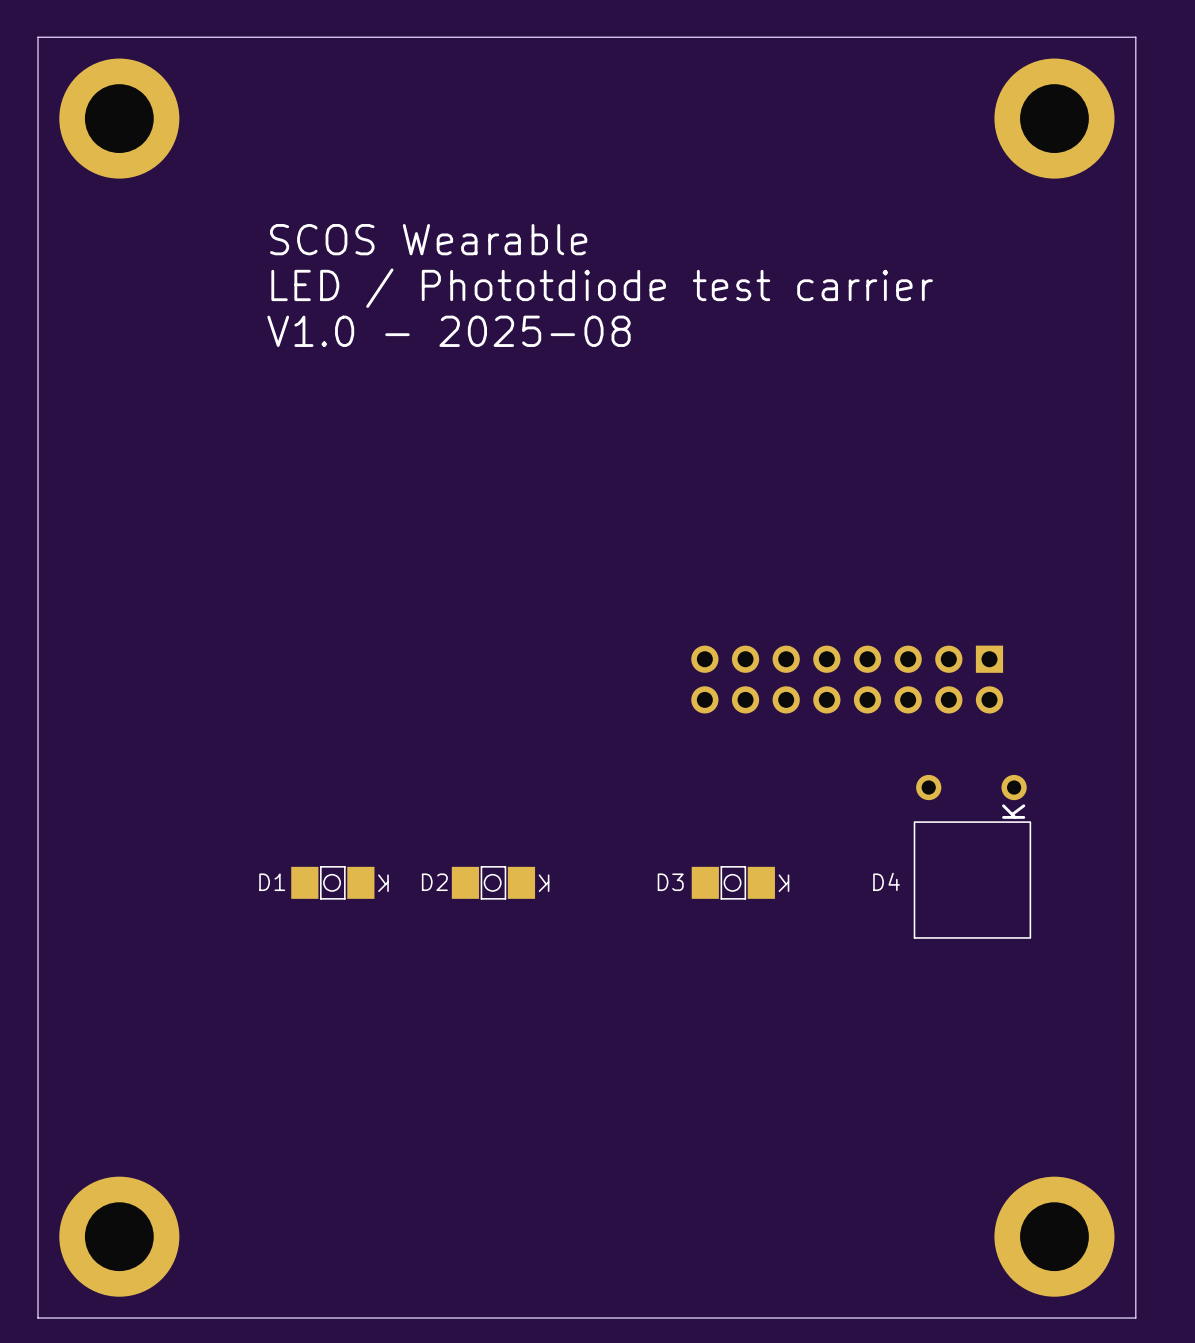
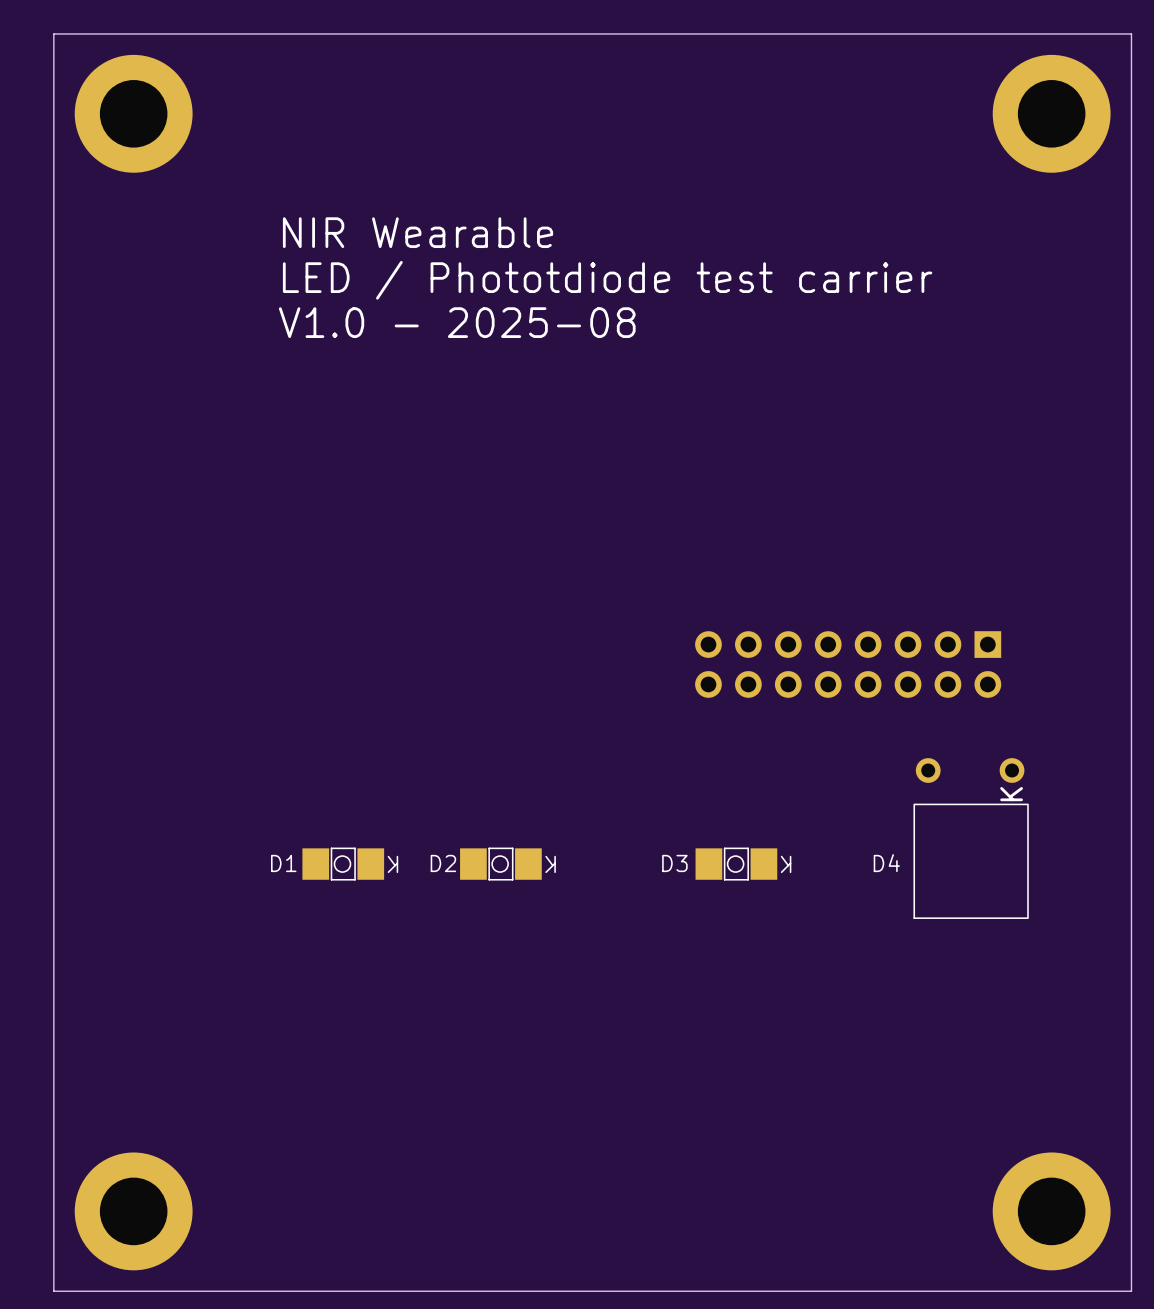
text: SCOS Wearable (428, 239) -> NIR Wearable (418, 232)

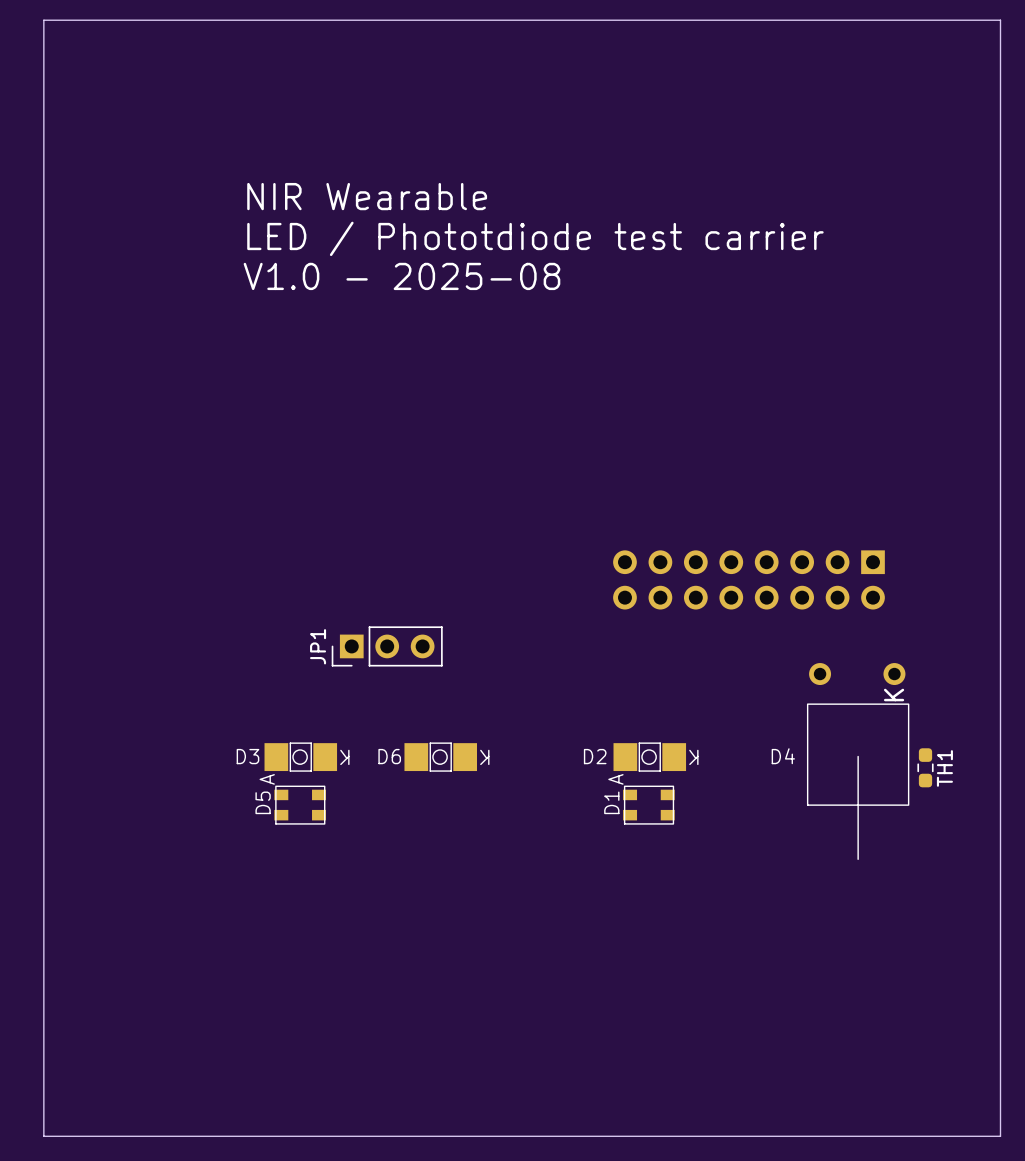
part: (133, 113) -> none
part: (1051, 113) -> none
JP1: none -> (387, 646)
D1 name: D1 (283, 863) -> D3 (247, 756)
D2 name: D2 (443, 863) -> D6 (389, 756)
D3 name: D3 (674, 863) -> D2 (595, 756)
line: none -> (858, 756) (858, 859)
TH1: none -> (925, 767)
D5: none -> (300, 805)
D1: none -> (648, 805)
part: (133, 1211) -> none
part: (1051, 1211) -> none

